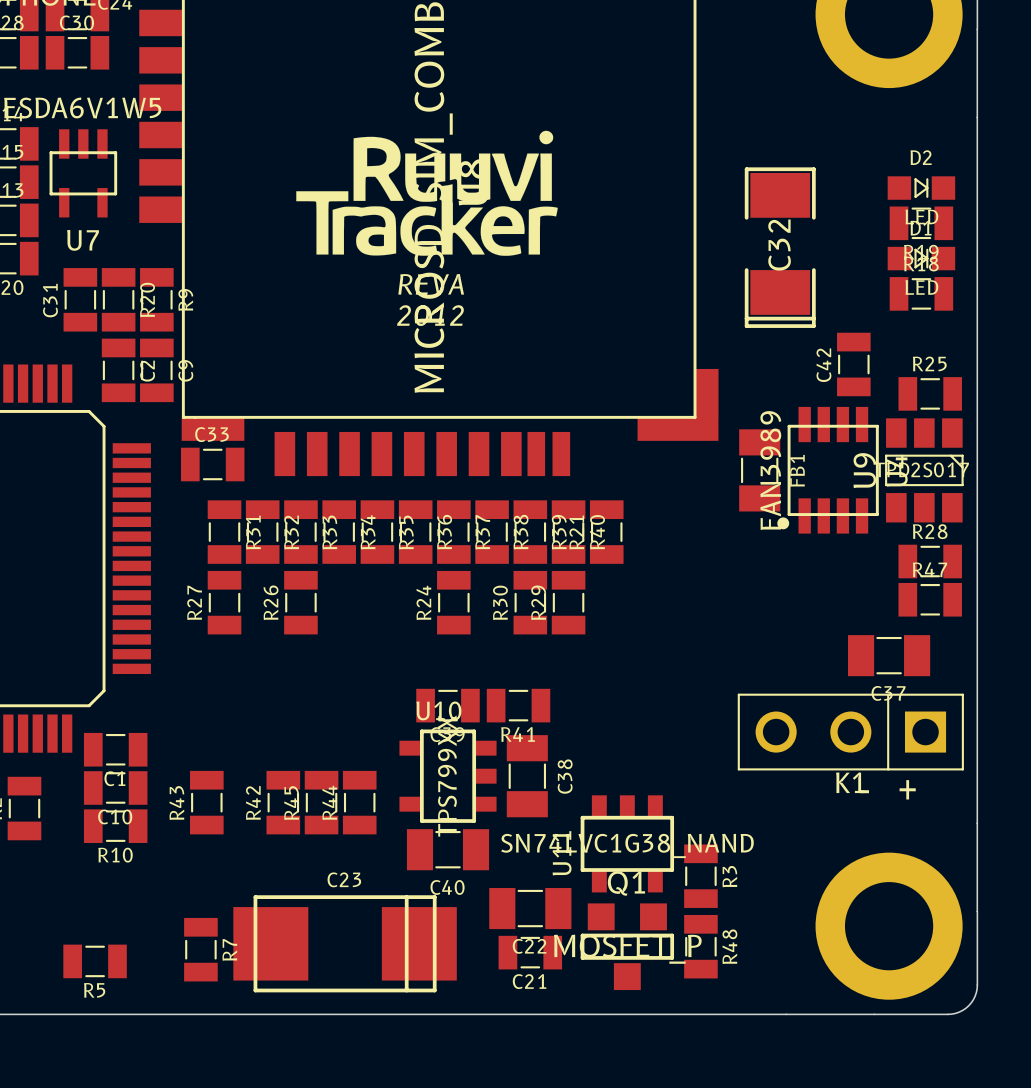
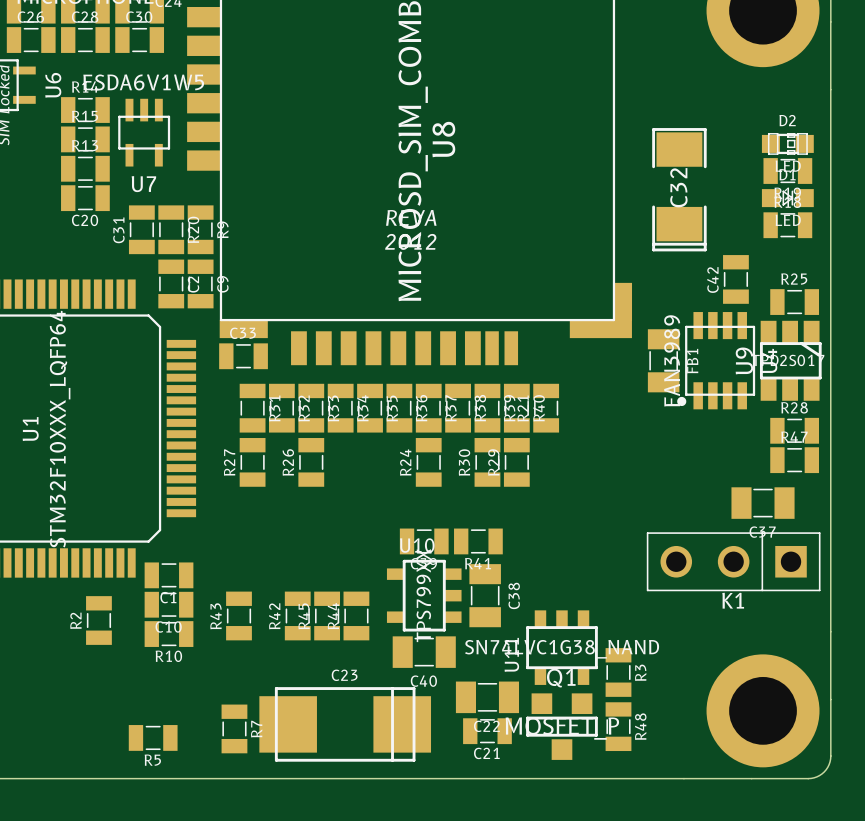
drawing: [296, 130, 558, 256] -> none
D2 footprint: [887, 176, 956, 200] -> [761, 133, 814, 155]
U9 footprint: [885, 418, 964, 523] -> [759, 320, 822, 401]
text: - + (887, 789) -> none

